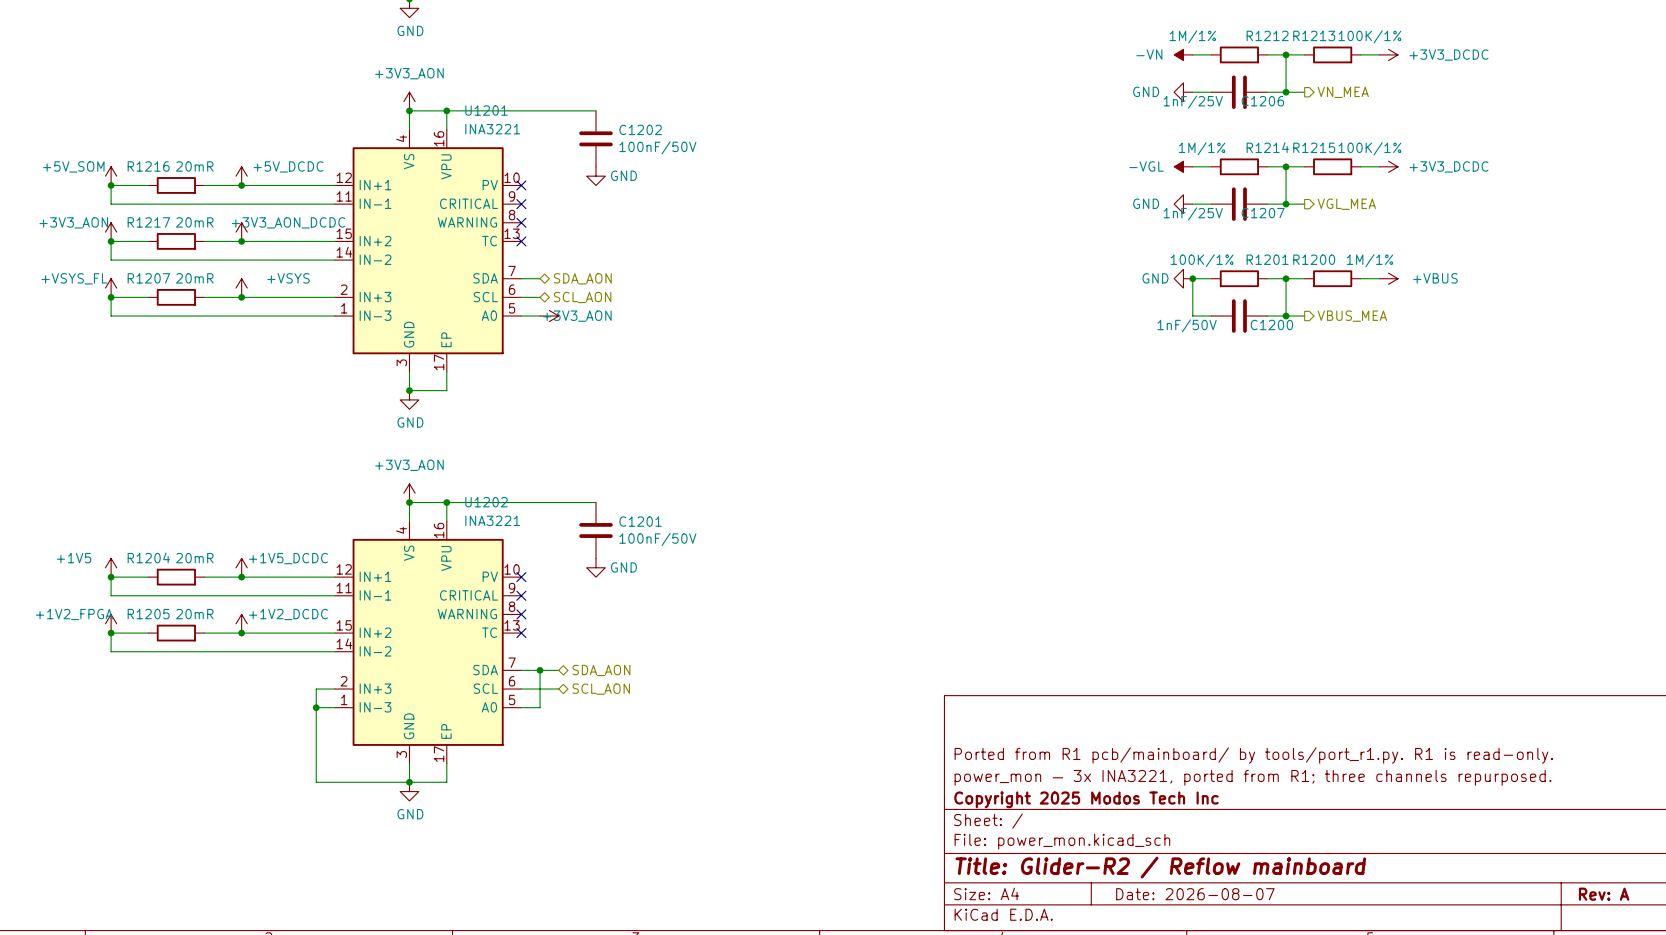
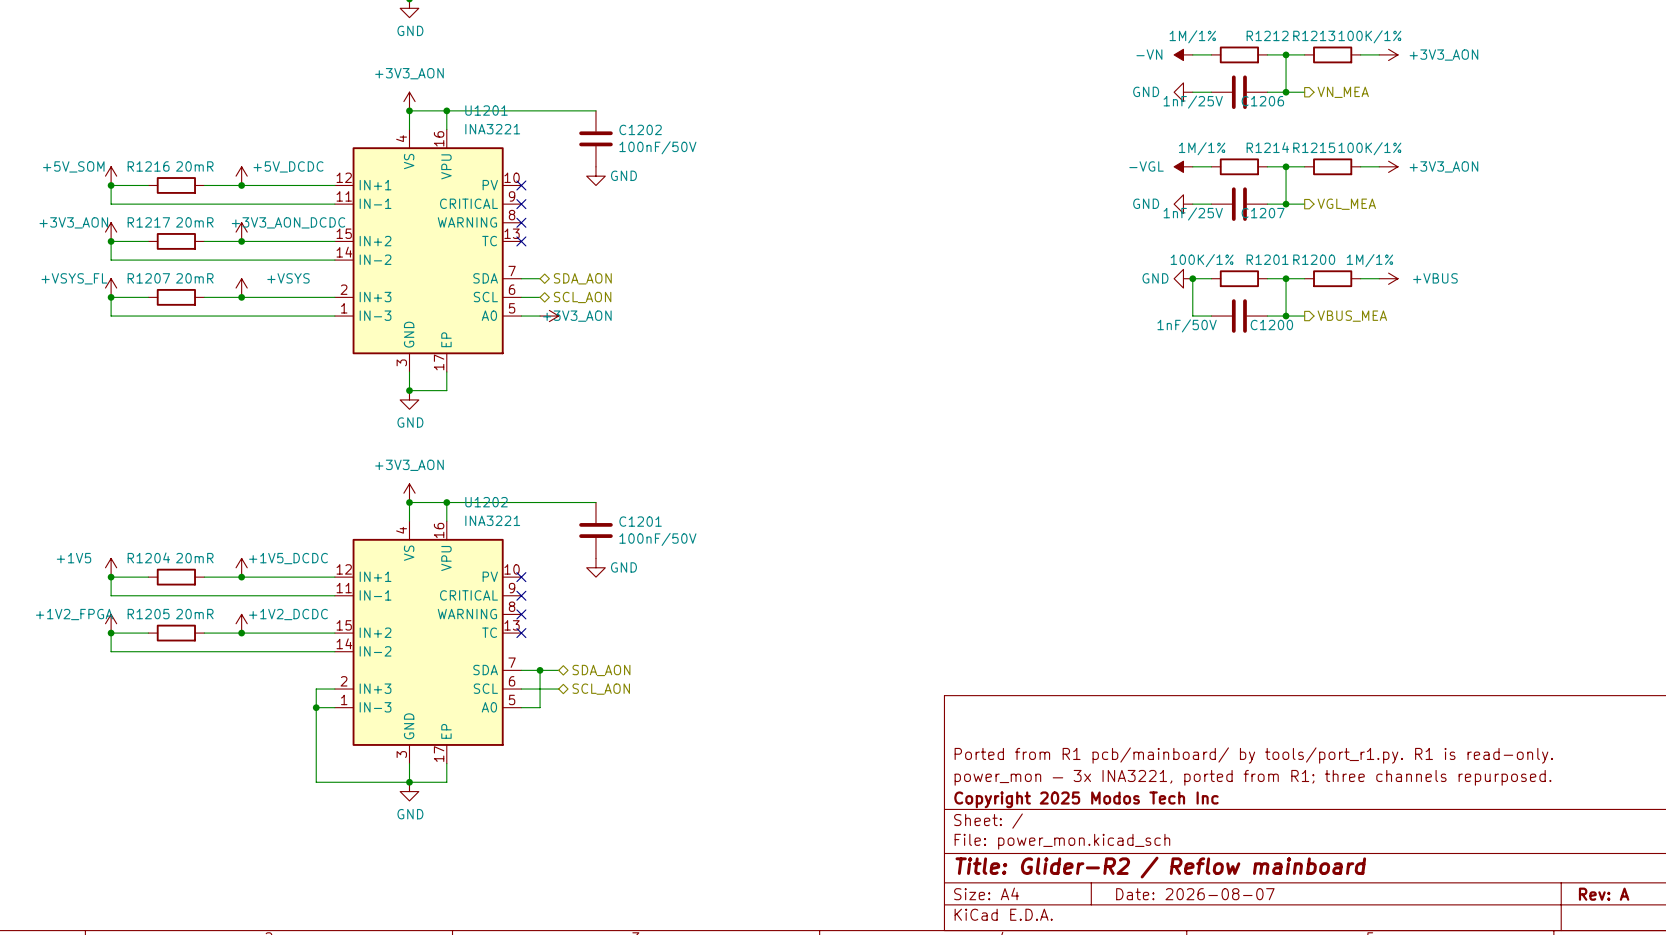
power symbol: +3V3_DCDC (1388, 54) -> +3V3_AON (1388, 54)
power symbol: +3V3_DCDC (1388, 166) -> +3V3_AON (1388, 166)

